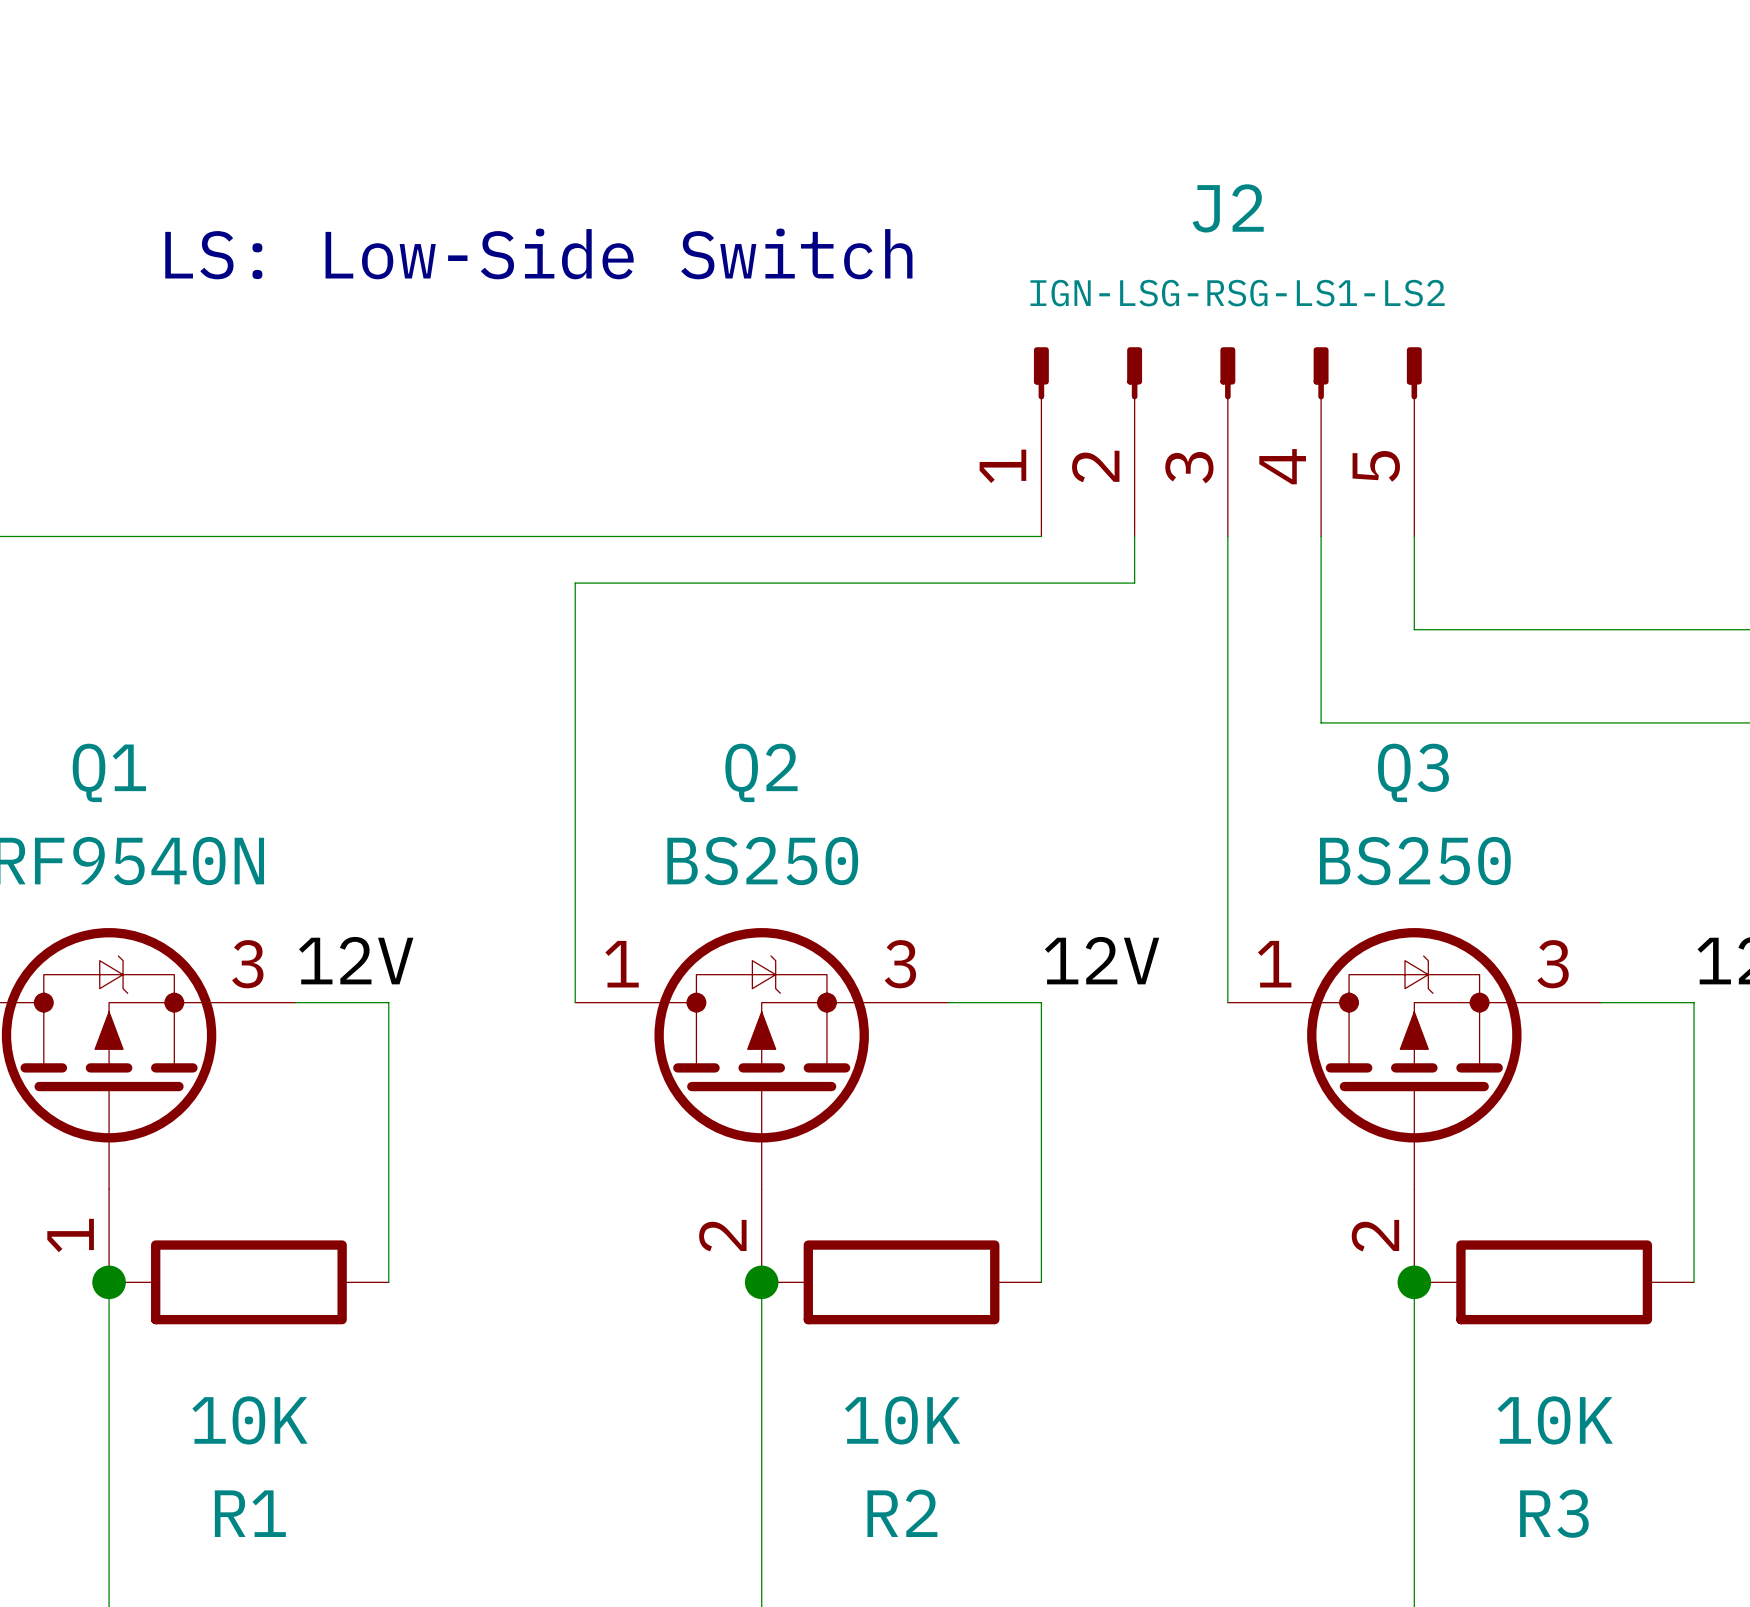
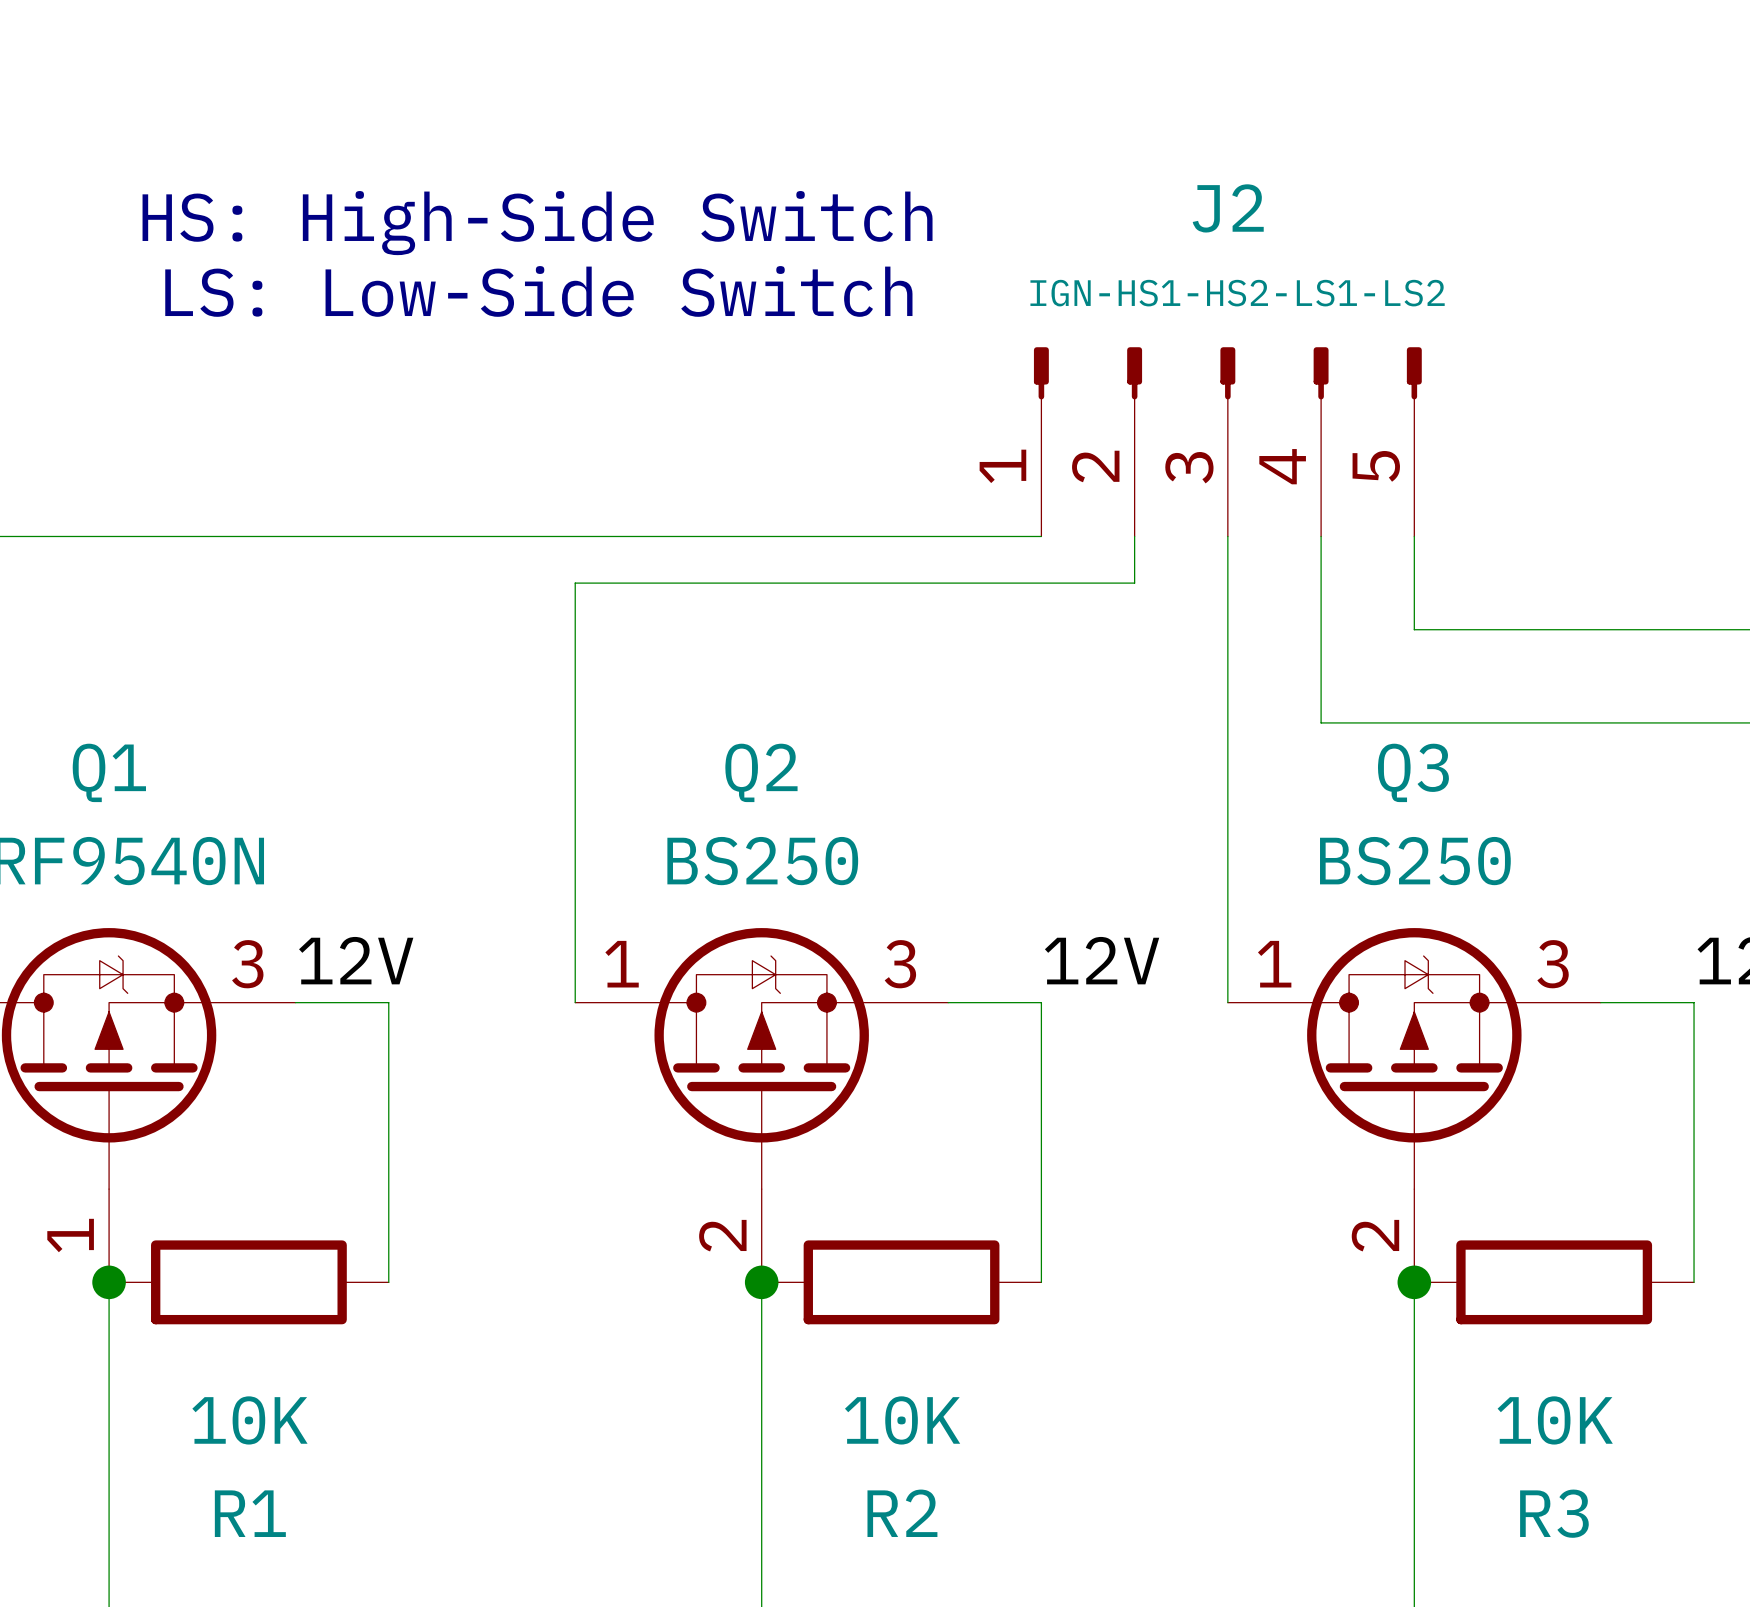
text: none -> HS: High-Side Switch (537, 223)
text position: LS: Low-Side Switch (538, 253) -> LS: Low-Side Switch (538, 291)
J2 value: IGN-LSG-RSG-LS1-LS2 (1237, 293) -> IGN-HS1-HS2-LS1-LS2 (1237, 293)

